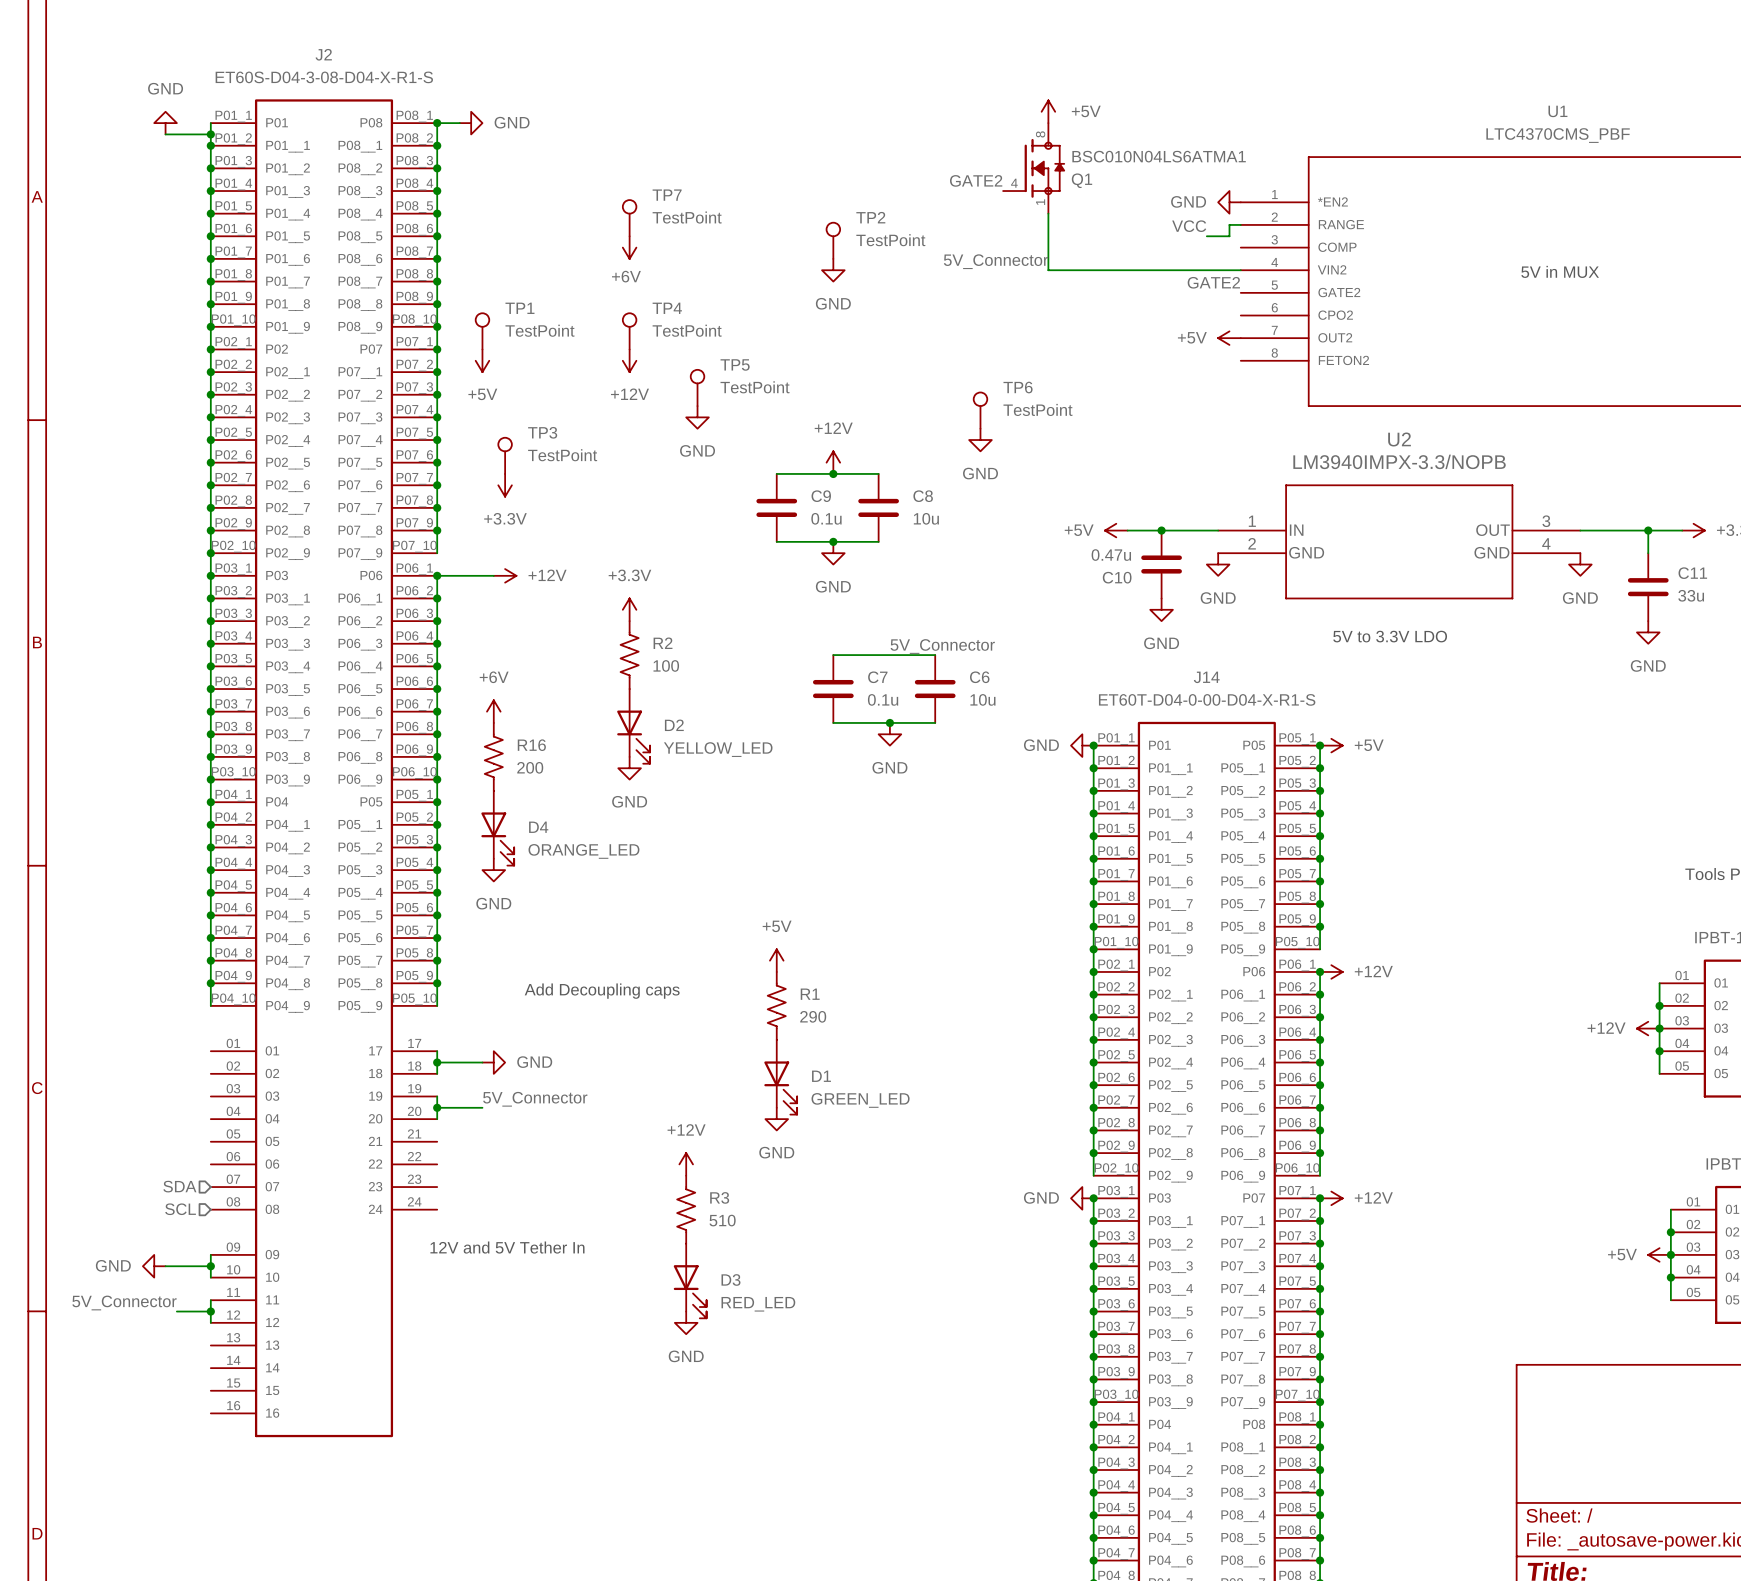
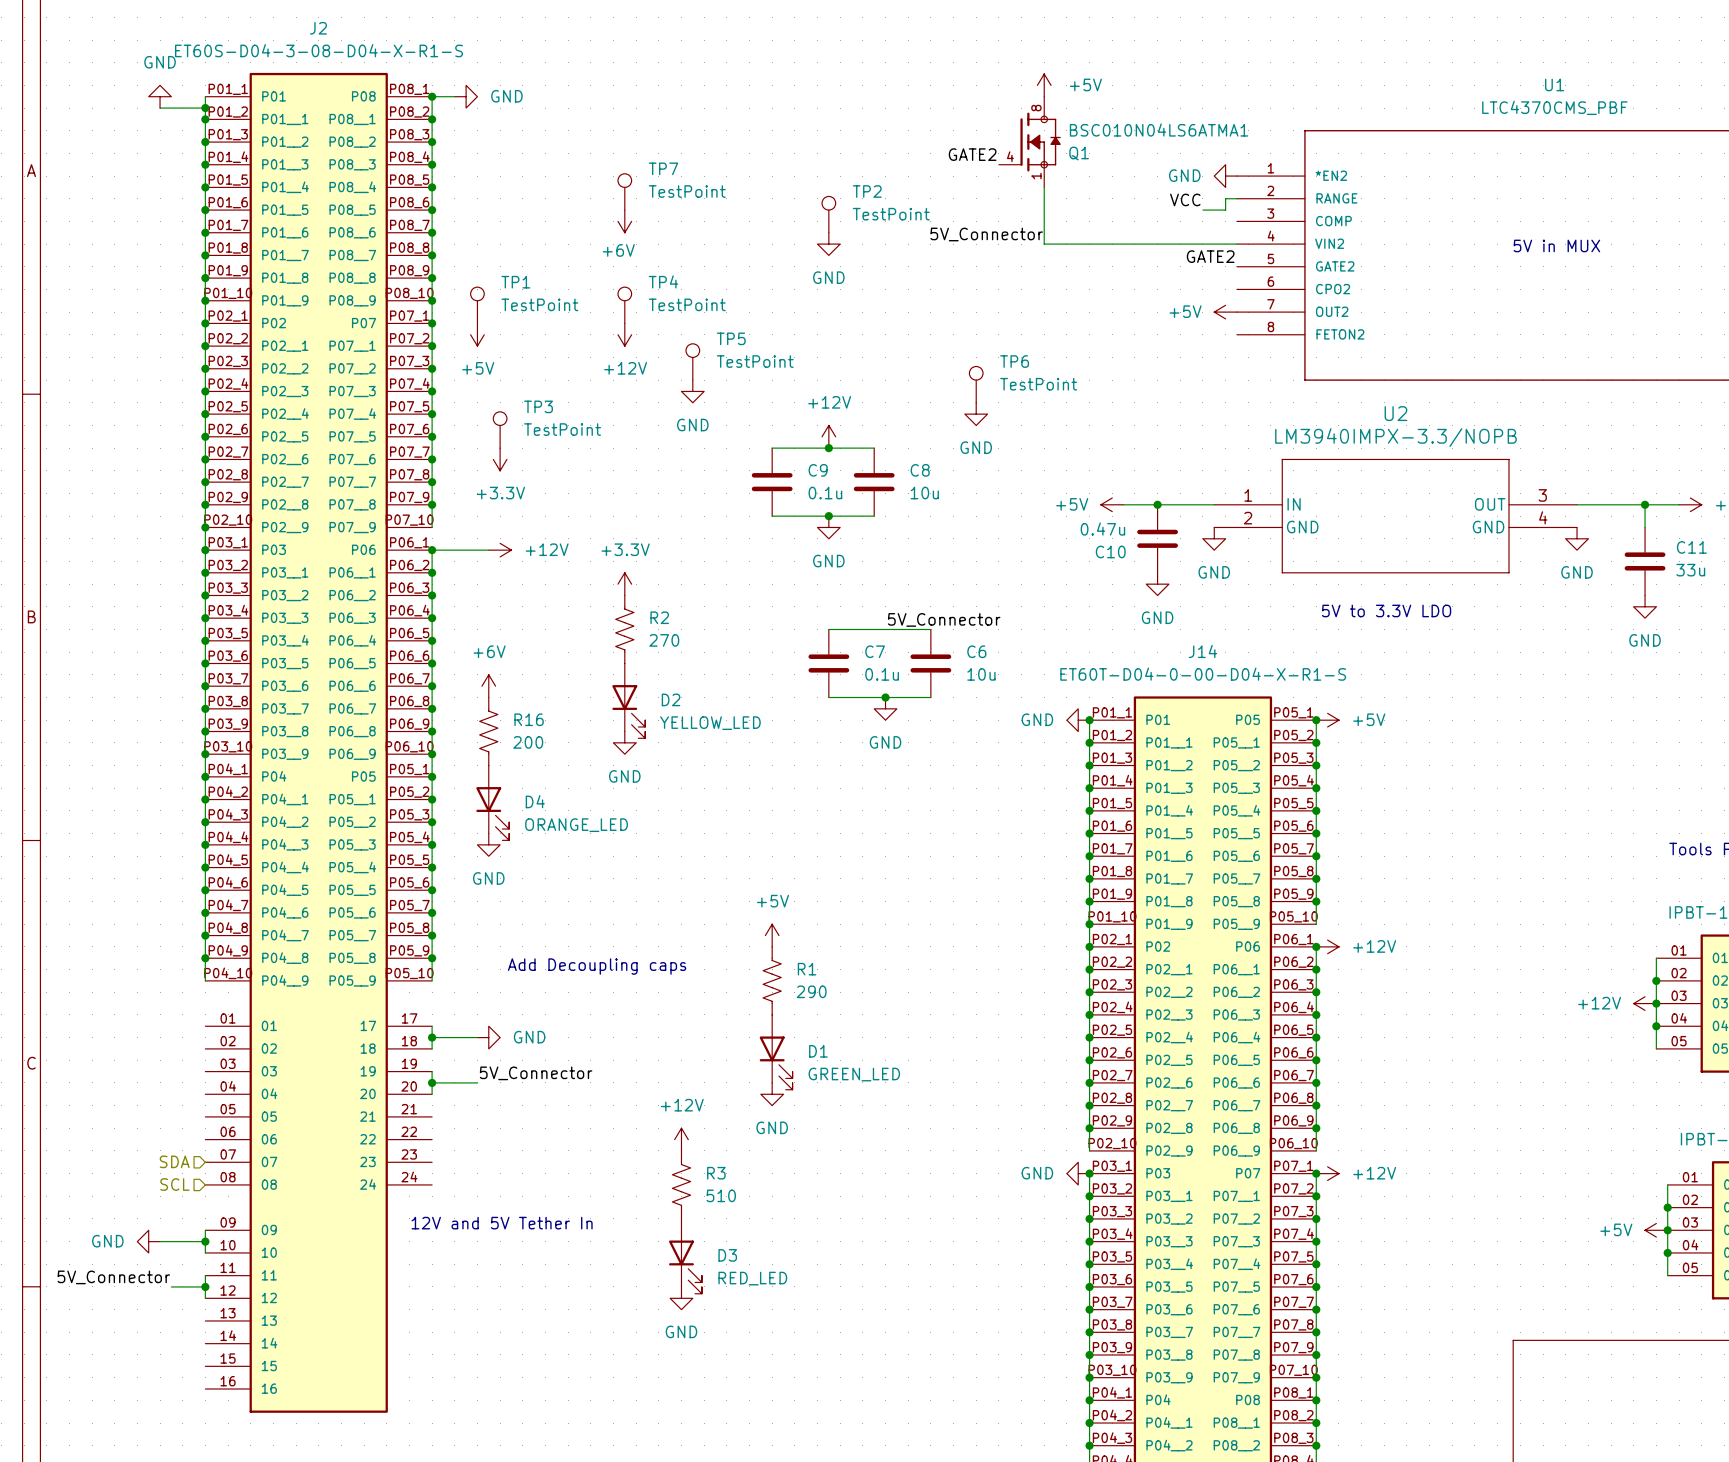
R2 value: 100 (666, 665) -> 270 (664, 640)

